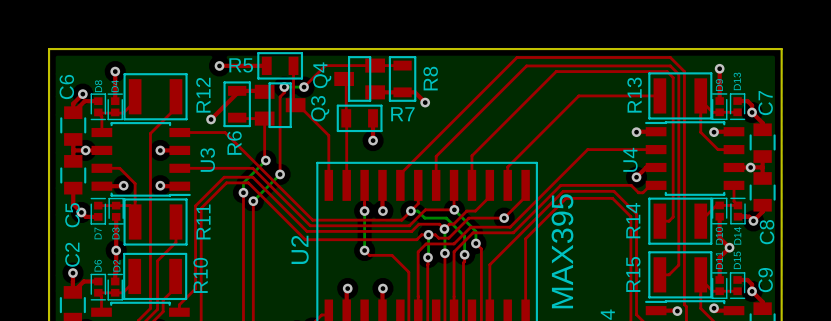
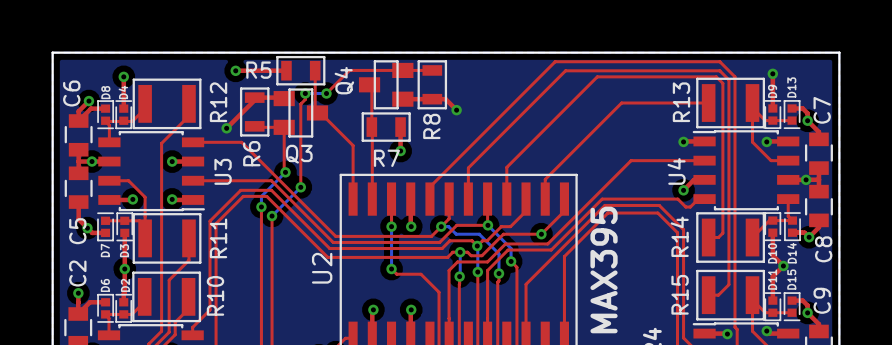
R8 name position: R8 (430, 78) -> R8 (431, 126)
Q3 name rotation: 0° (320, 108) -> 90° clockwise (299, 154)
Q3 name position: Q3 (320, 108) -> Q3 (299, 154)
R7 name position: R7 (402, 114) -> R7 (386, 158)

